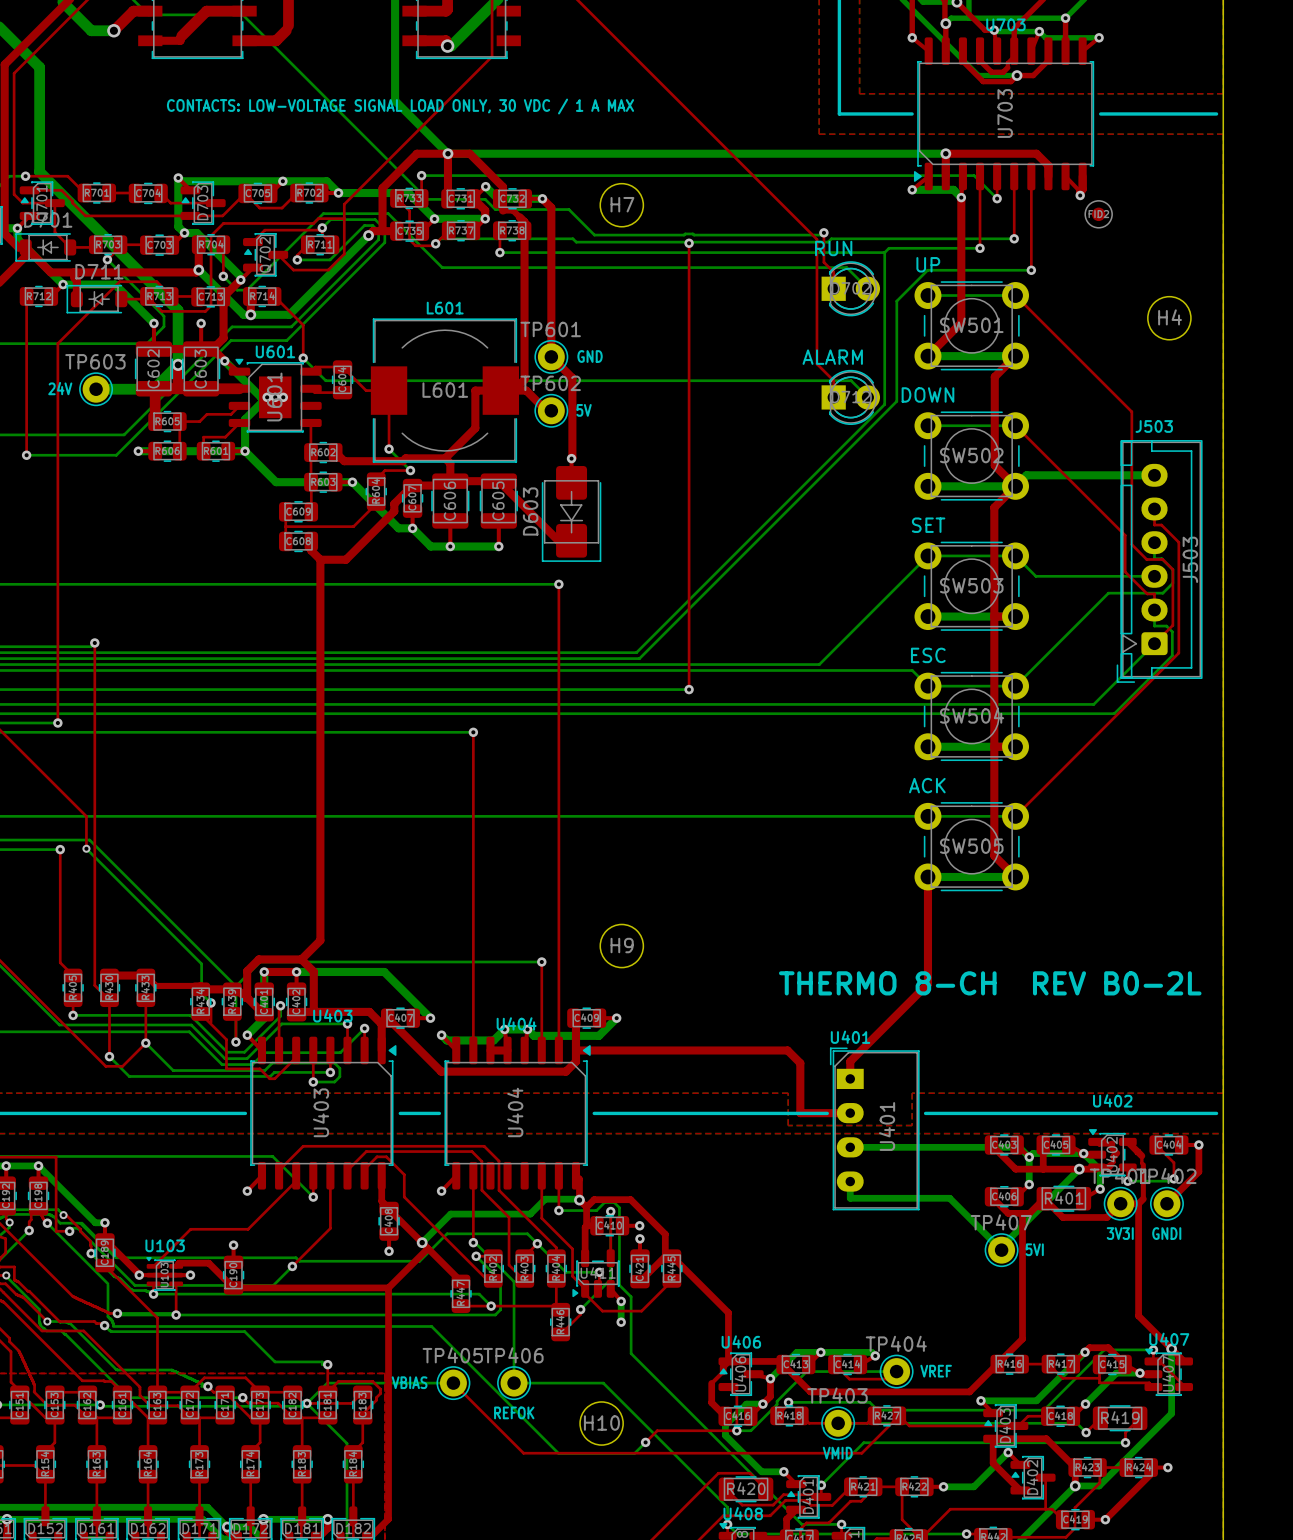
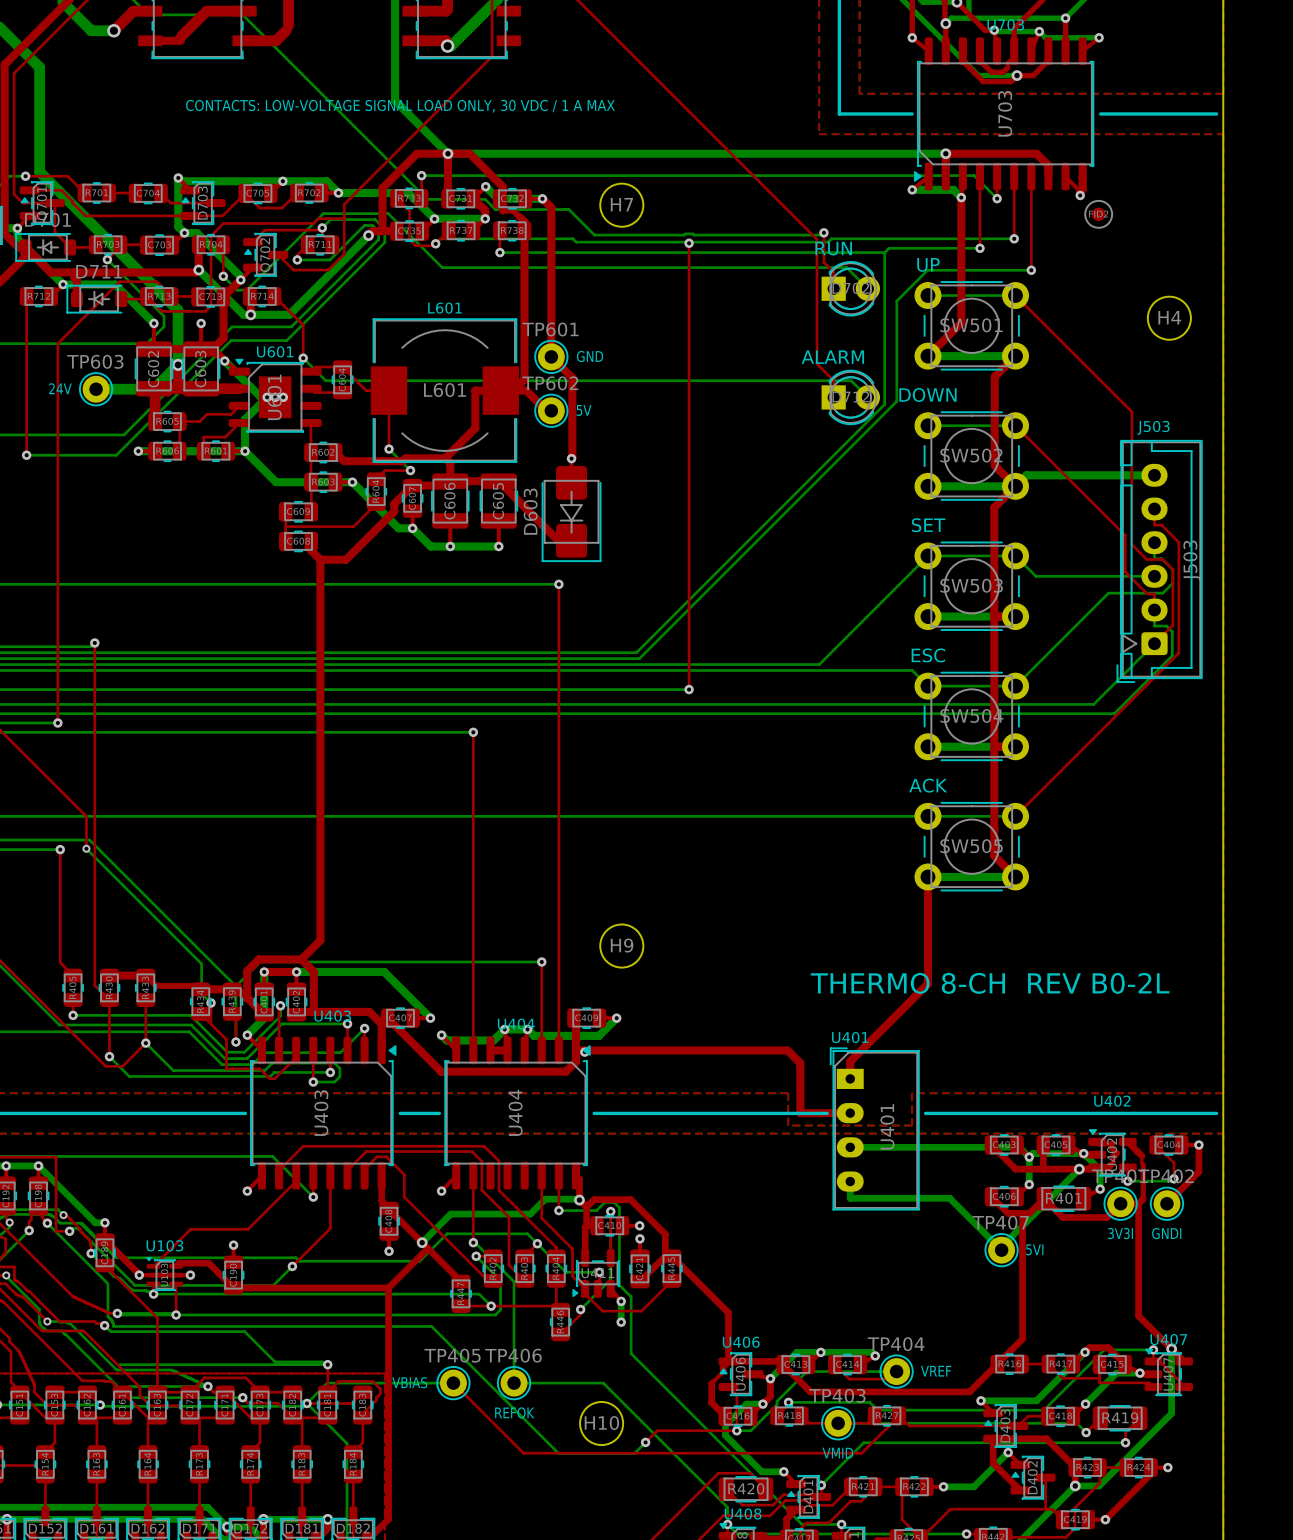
via: none -> (584, 1052)
bottom track: none -> (119, 1364) (322, 1364)
bottom track: none -> (128, 1386) (201, 1386)

